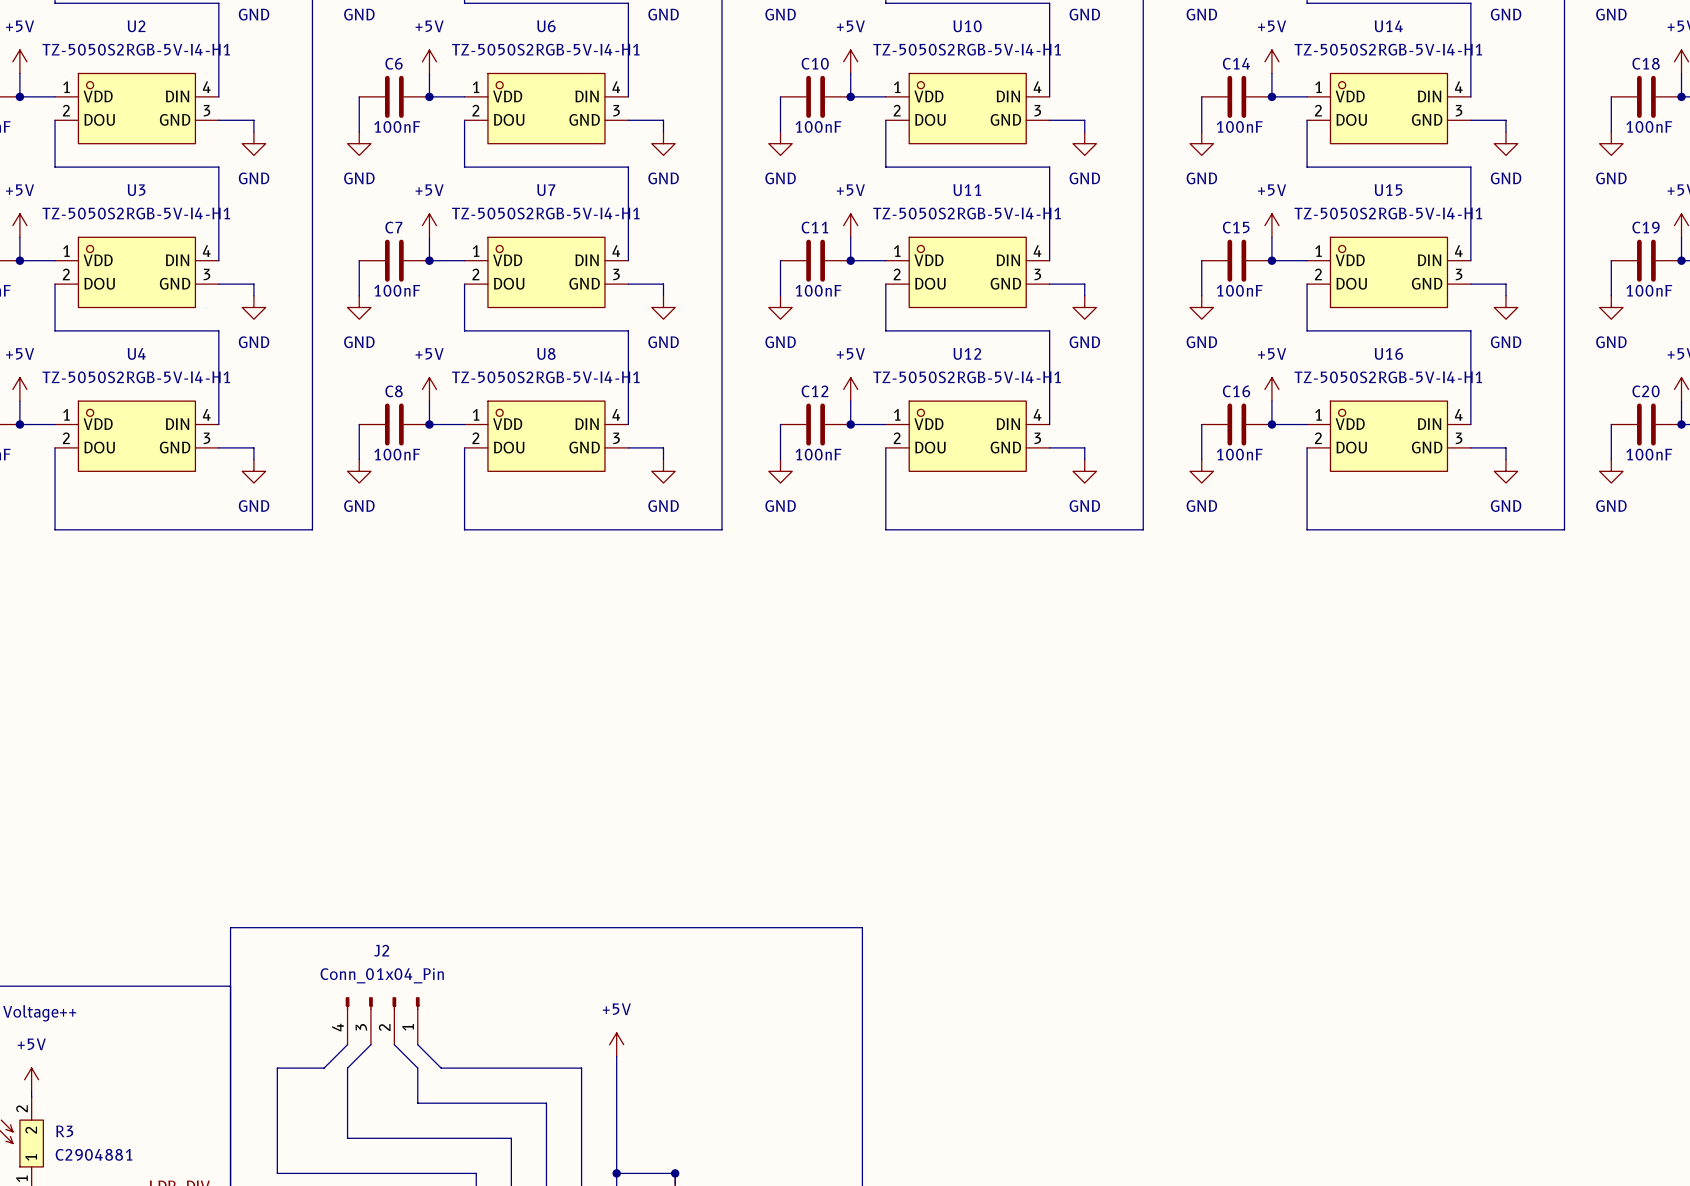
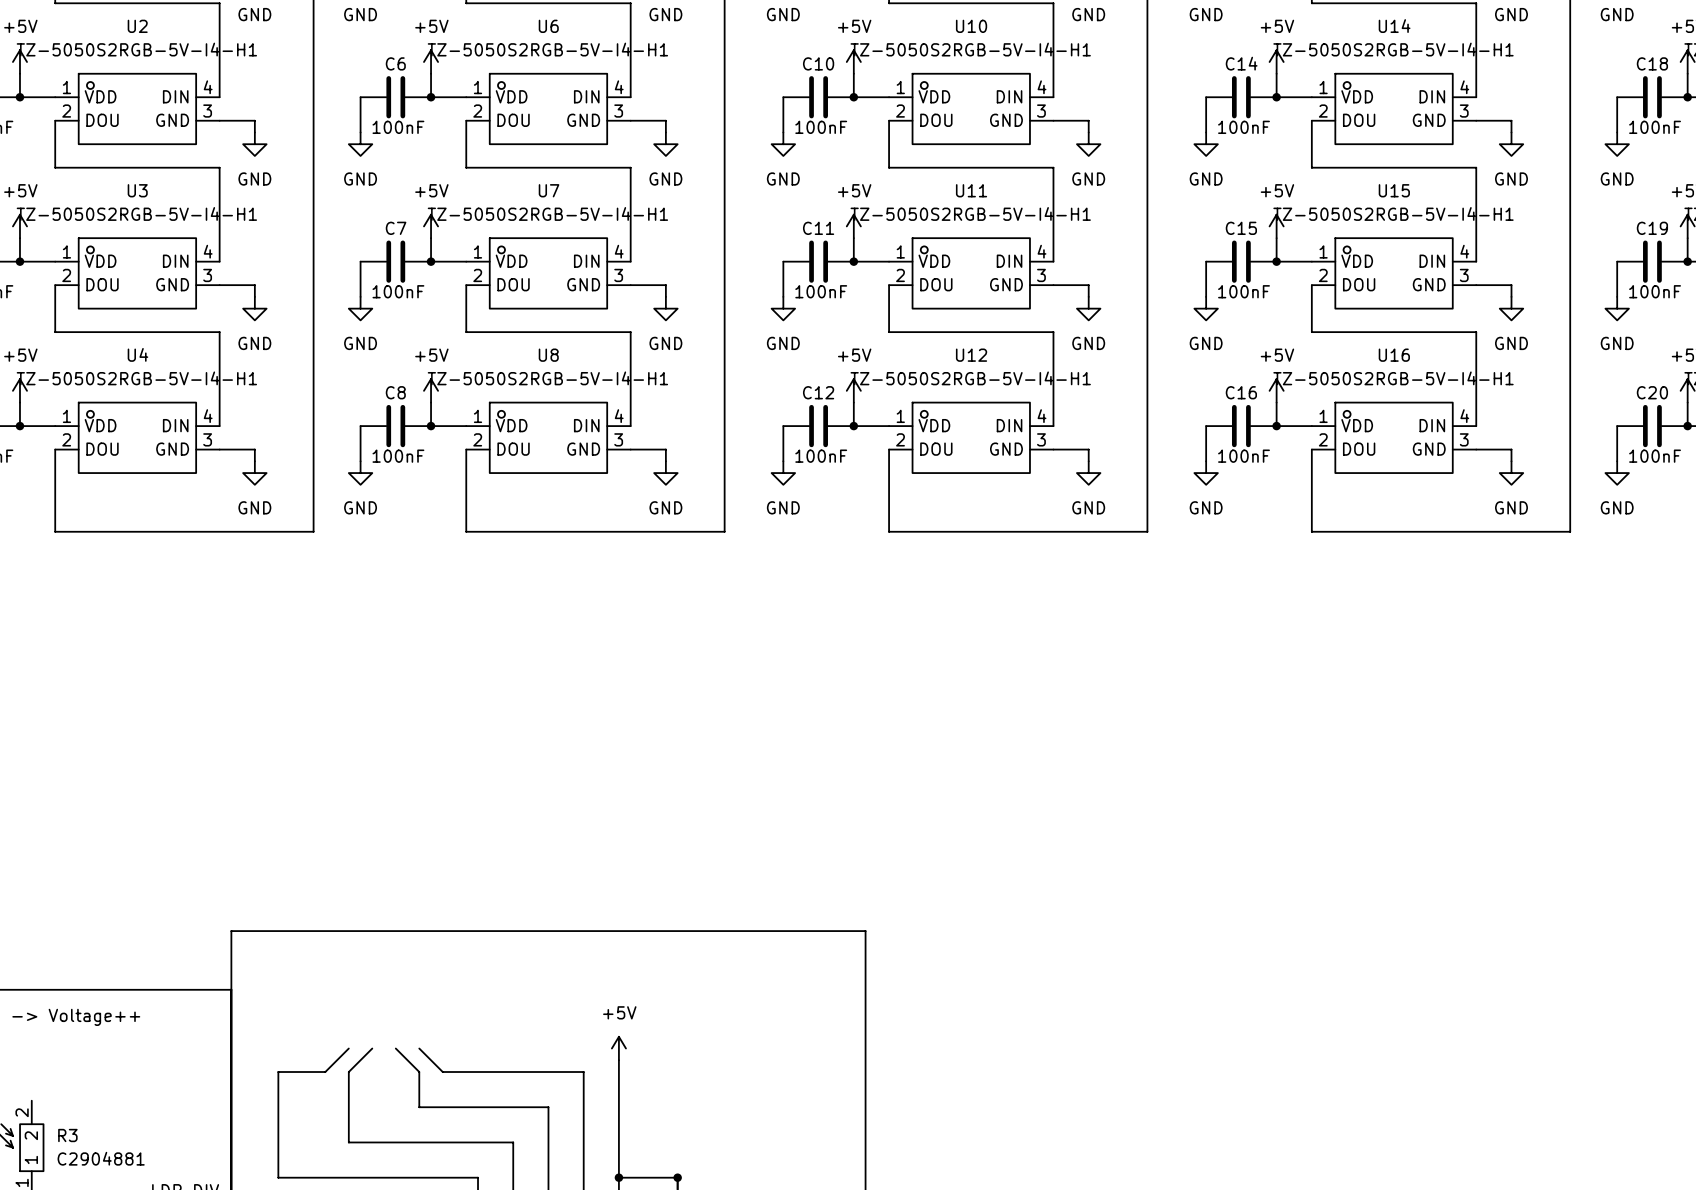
J2: Conn_01x04_Pin (382, 1020) -> none
power symbol: +5V (31, 1079) -> none
wire: (31, 1091) (31, 1096) -> none

